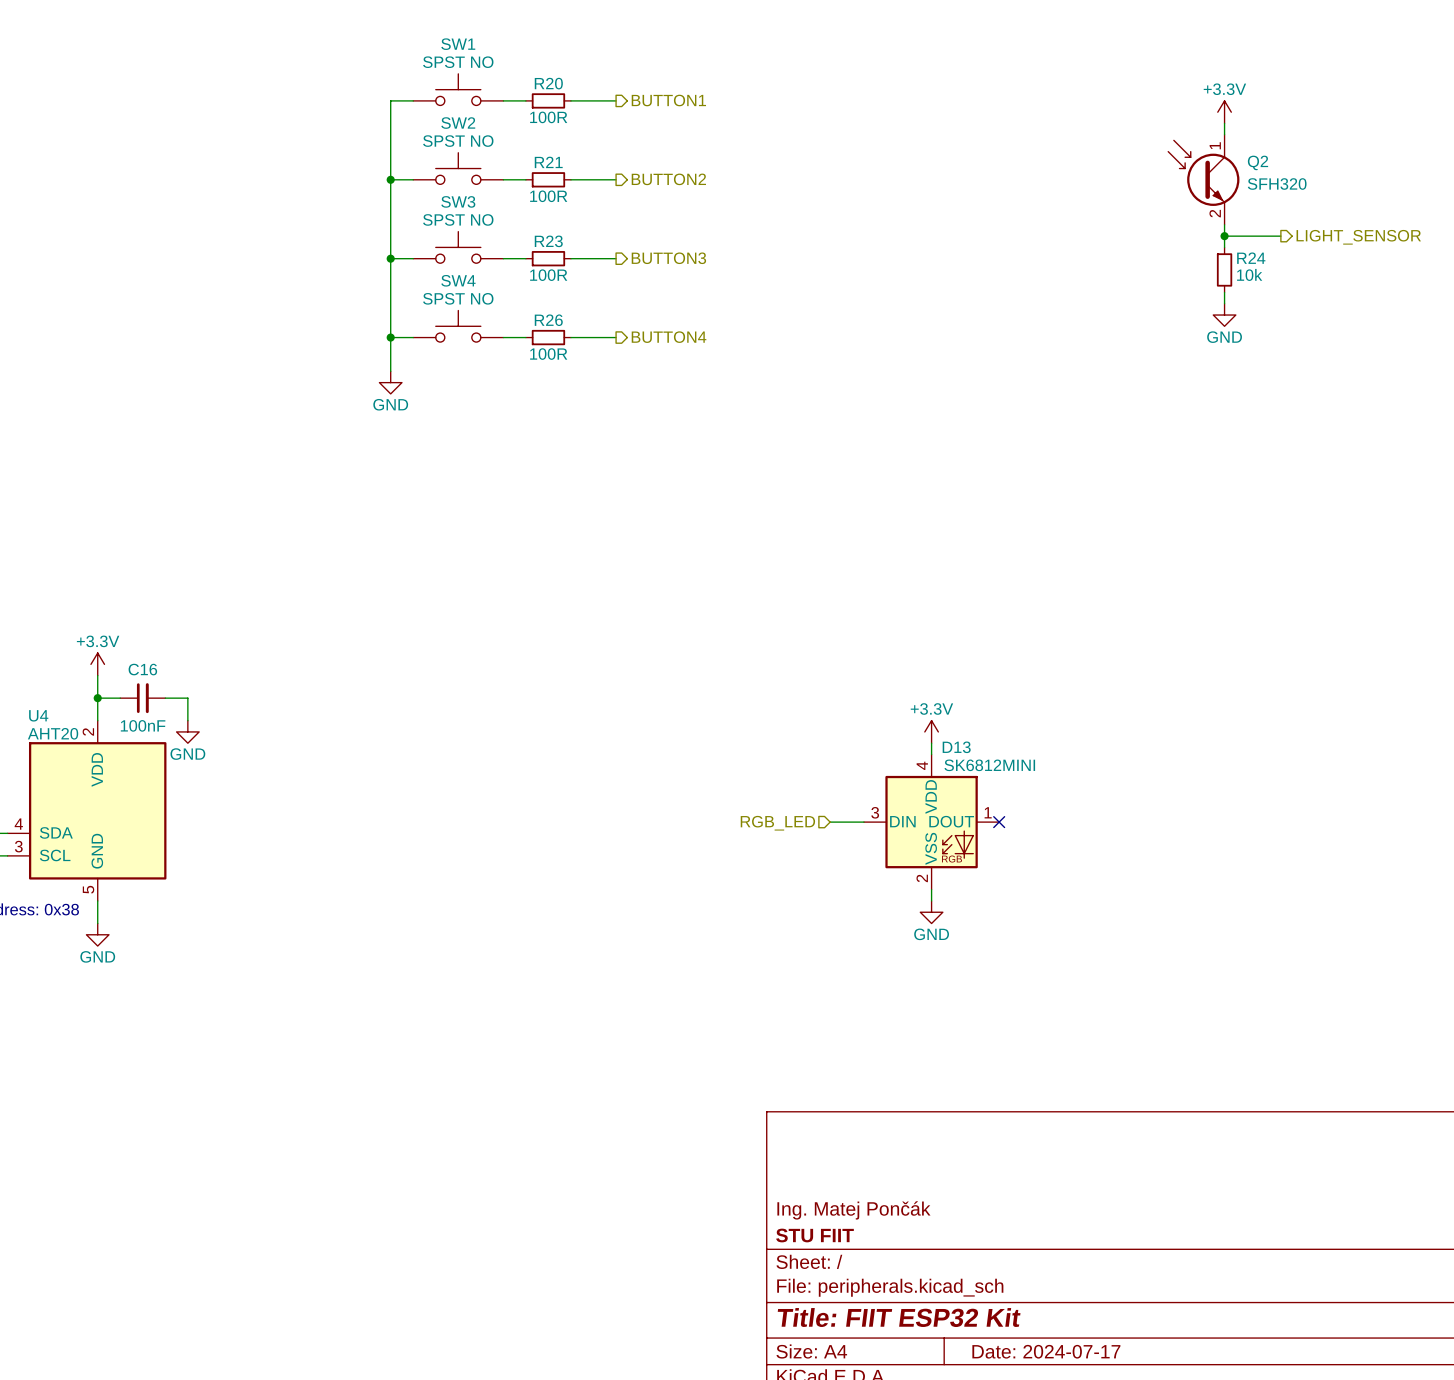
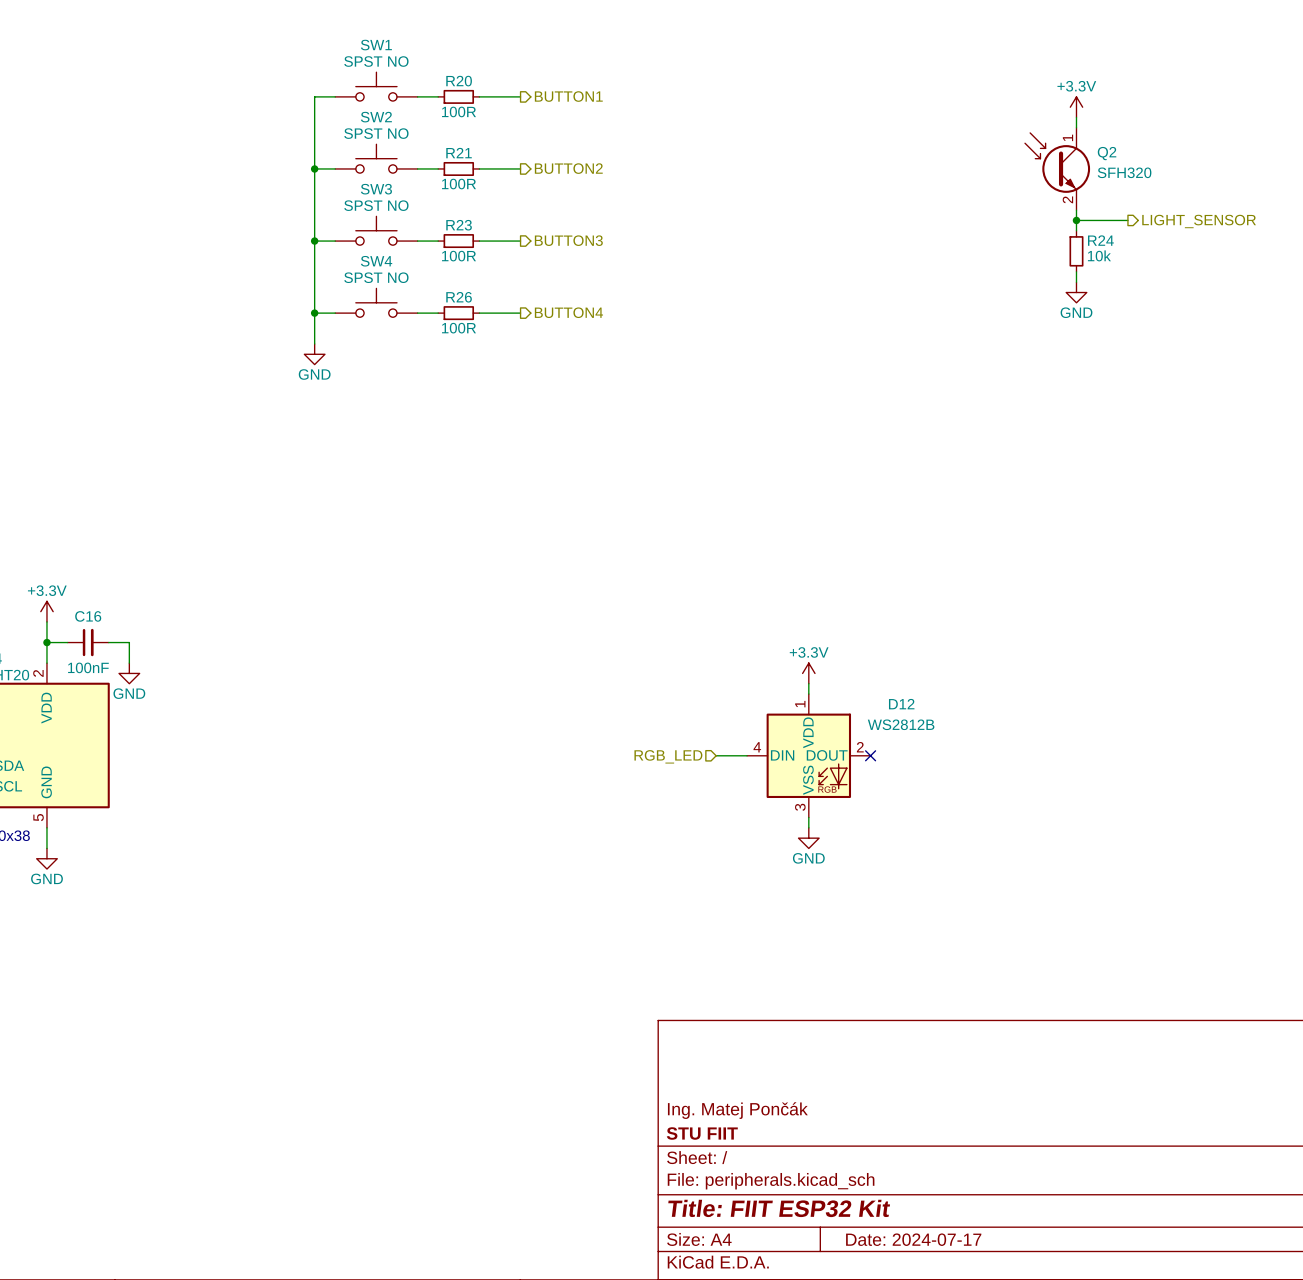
D13 name: D13 (956, 747) -> D12 (901, 704)
D13 pin number: 4 (922, 765) -> 1 (800, 704)
D13 value: SK6812MINI (989, 765) -> WS2812B (901, 724)
D13 pin number: 3 (875, 812) -> 4 (757, 747)
D13 pin number: 1 (988, 812) -> 2 (860, 747)
D13 pin number: 2 (922, 878) -> 3 (800, 807)

